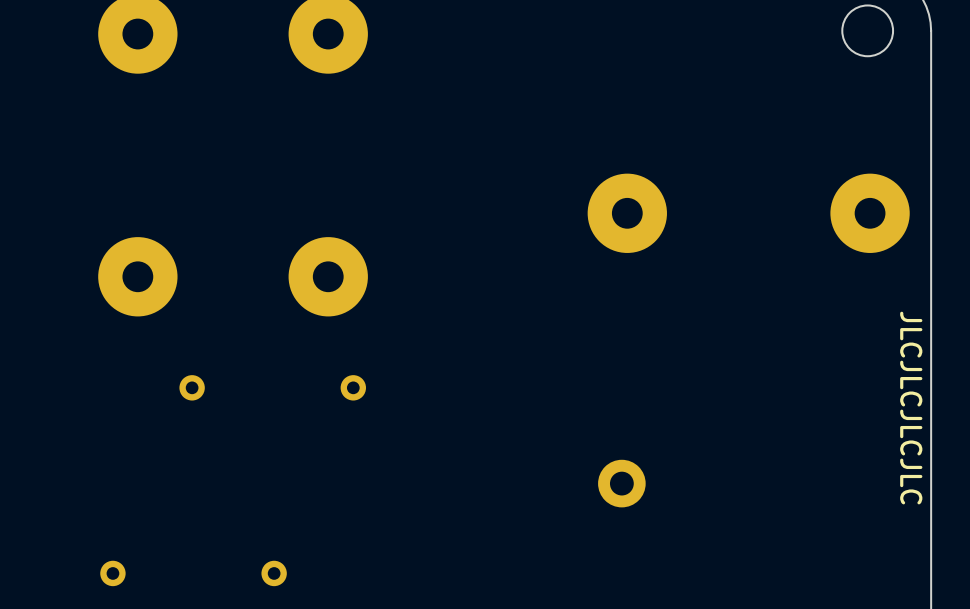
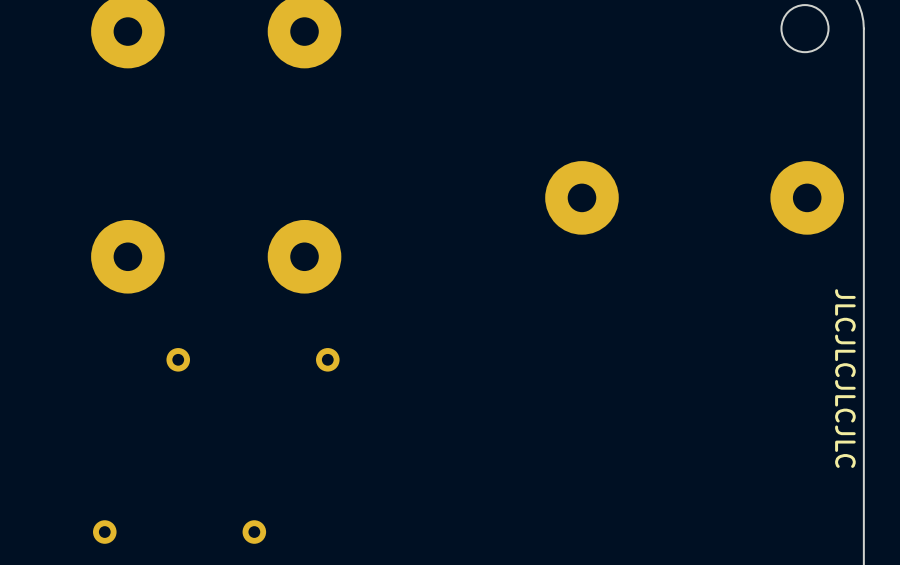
part: (621, 483) -> none

